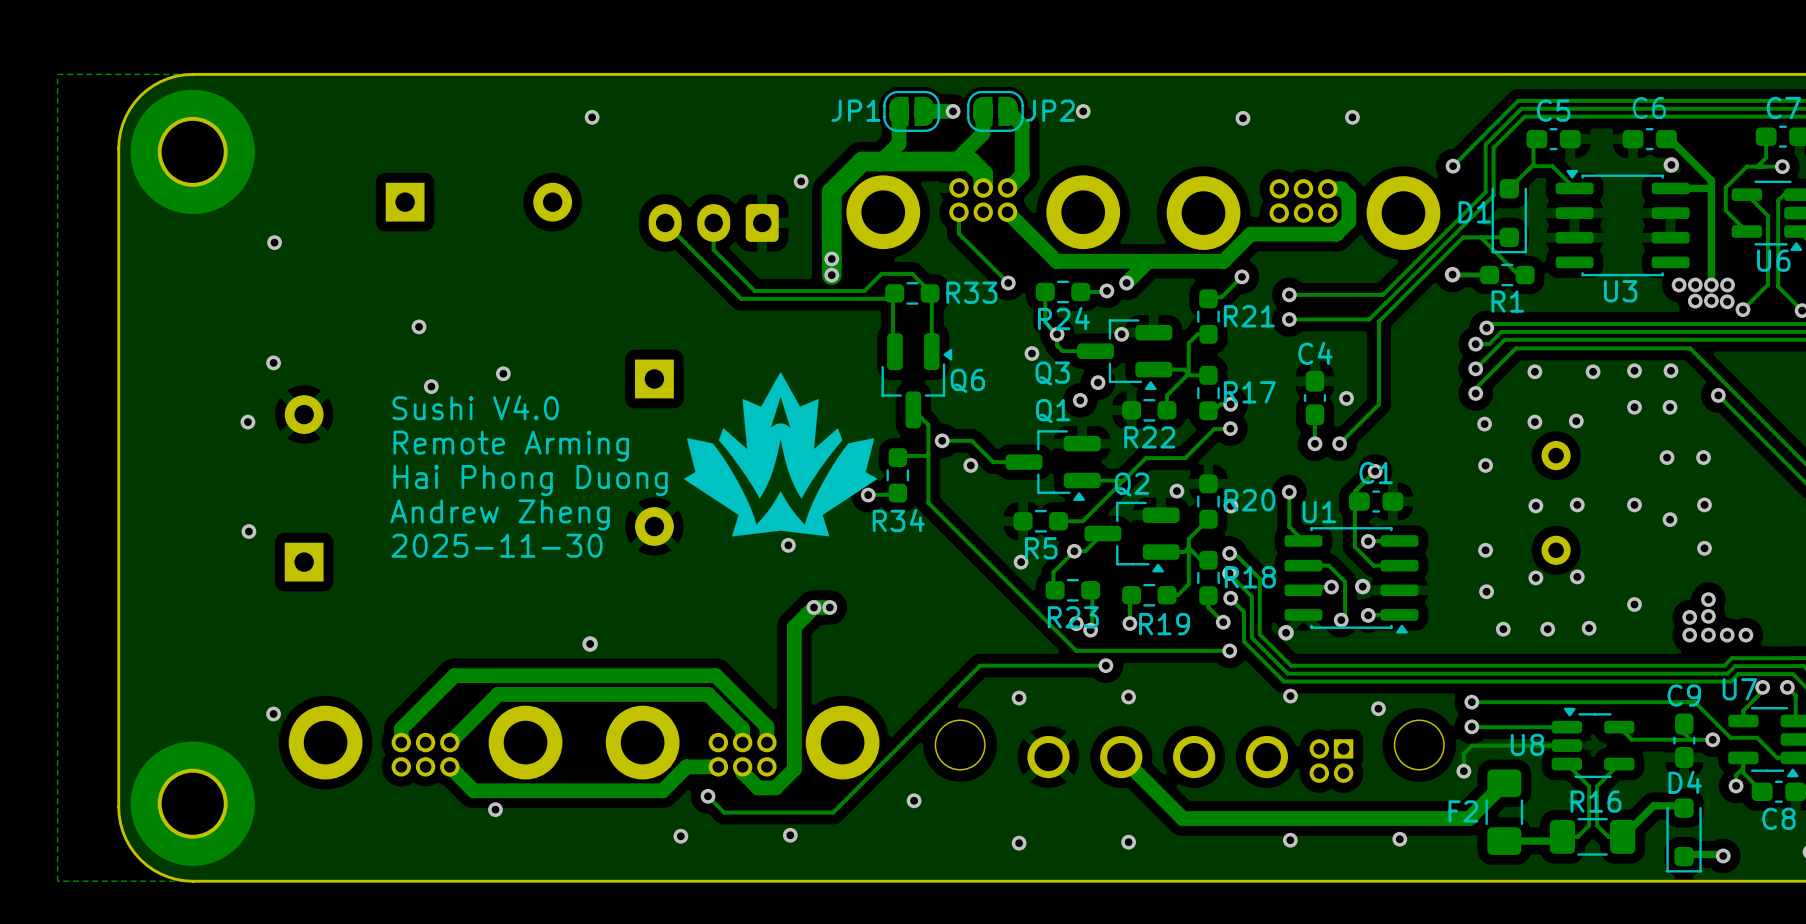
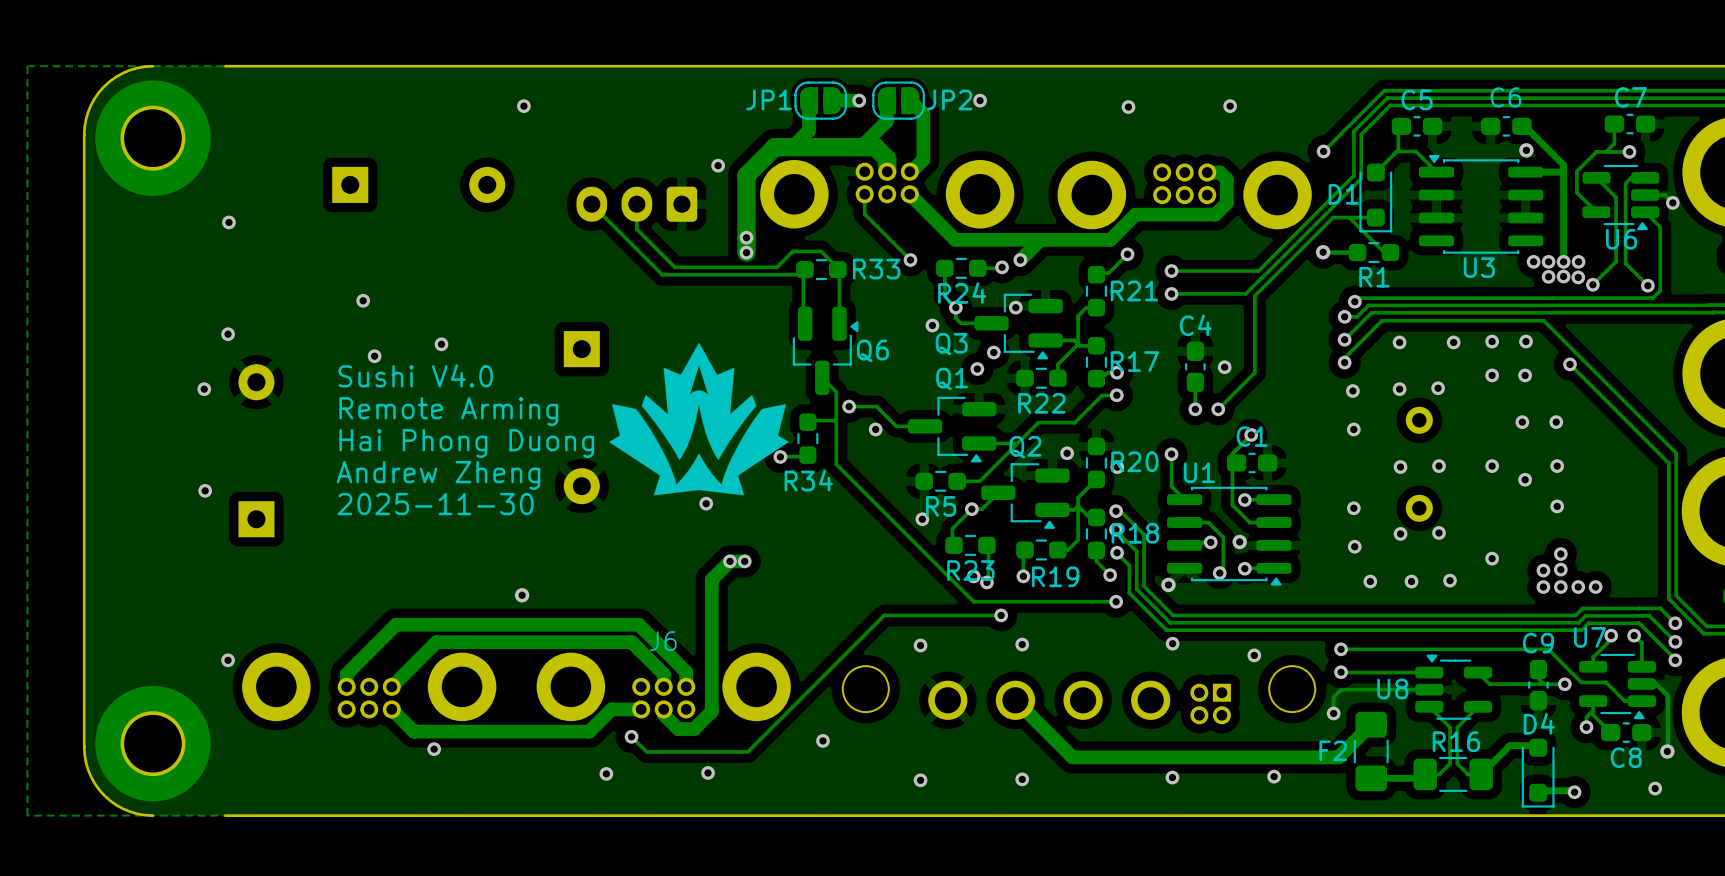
board edge: (270, 74) (192, 74) -> none
J6 name: none -> J6 (663, 641)
board edge: (270, 881) (192, 881) -> none

